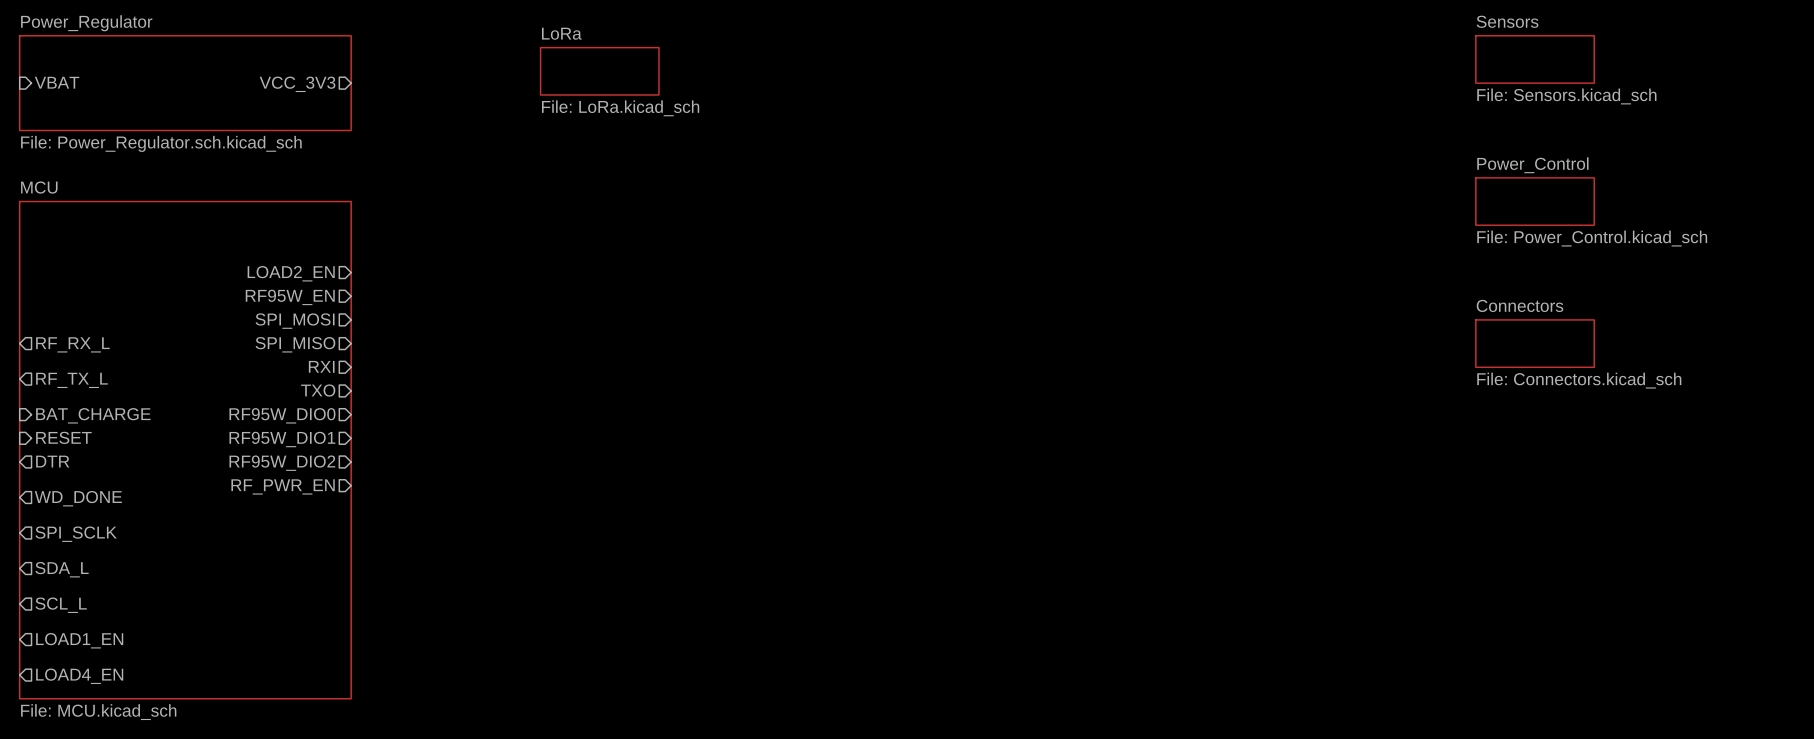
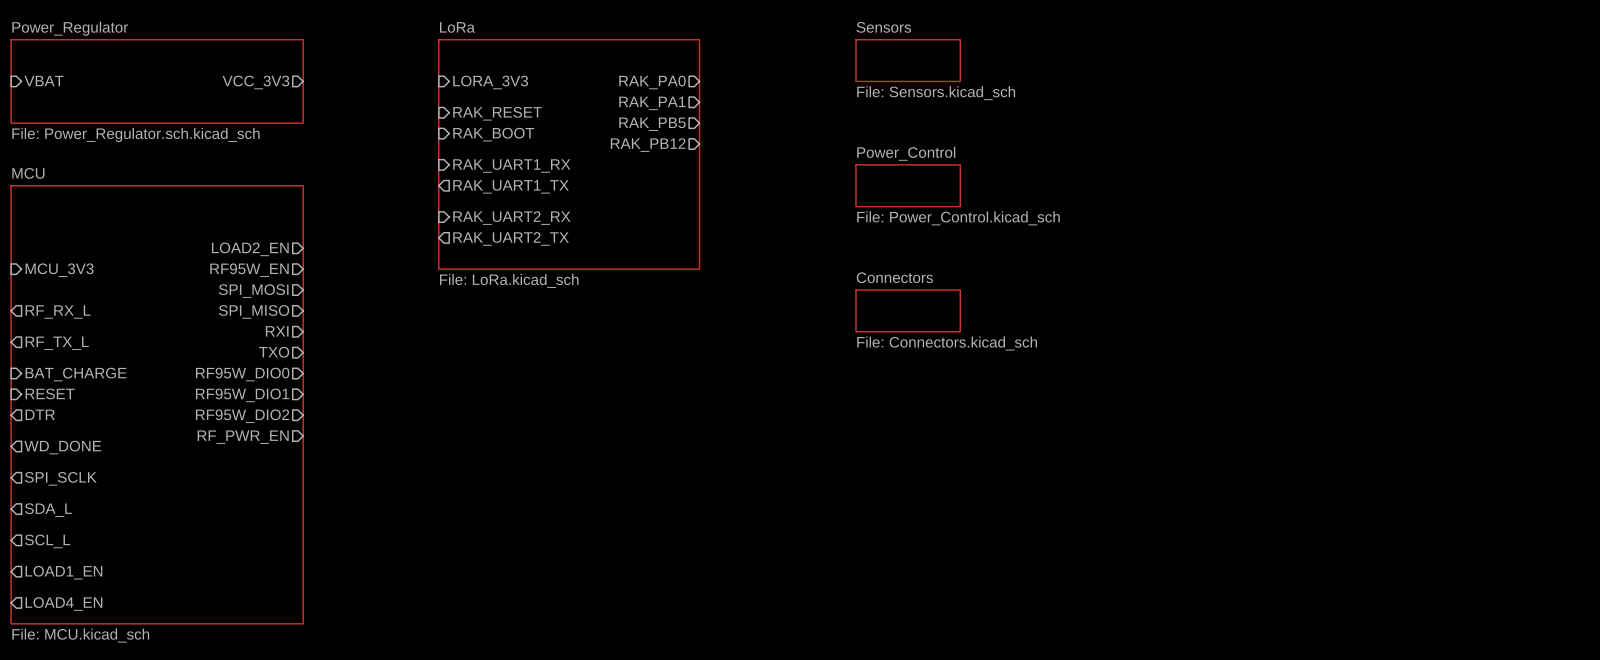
sheet Sensors: none -> File: Sensors.kicad_sch (908, 60)
sheet Sensors: File: Sensors.kicad_sch (1535, 59) -> none
sheet LoRa: File: LoRa.kicad_sch (599, 71) -> none
sheet pin: none -> LORA_3V3 (490, 82)
sheet pin: none -> RAK_PA0 (652, 82)
sheet pin: none -> RAK_PA1 (652, 103)
sheet pin: none -> RAK_RESET (497, 113)
sheet pin: none -> RAK_PB5 (652, 124)
sheet pin: none -> RAK_BOOT (493, 134)
sheet pin: none -> RAK_PB12 (648, 145)
sheet LoRa: none -> File: LoRa.kicad_sch (569, 154)
sheet pin: none -> RAK_UART1_RX (511, 165)
sheet Power_Control: none -> File: Power_Control.kicad_sch (908, 185)
sheet Power_Control: File: Power_Control.kicad_sch (1535, 201) -> none
sheet pin: none -> RAK_UART1_TX (511, 186)
sheet pin: none -> RAK_UART2_RX (511, 218)
sheet pin: none -> RAK_UART2_TX (511, 238)
sheet pin: none -> MCU_3V3 (59, 270)
sheet Connectors: none -> File: Connectors.kicad_sch (908, 310)
sheet Connectors: File: Connectors.kicad_sch (1535, 343) -> none

